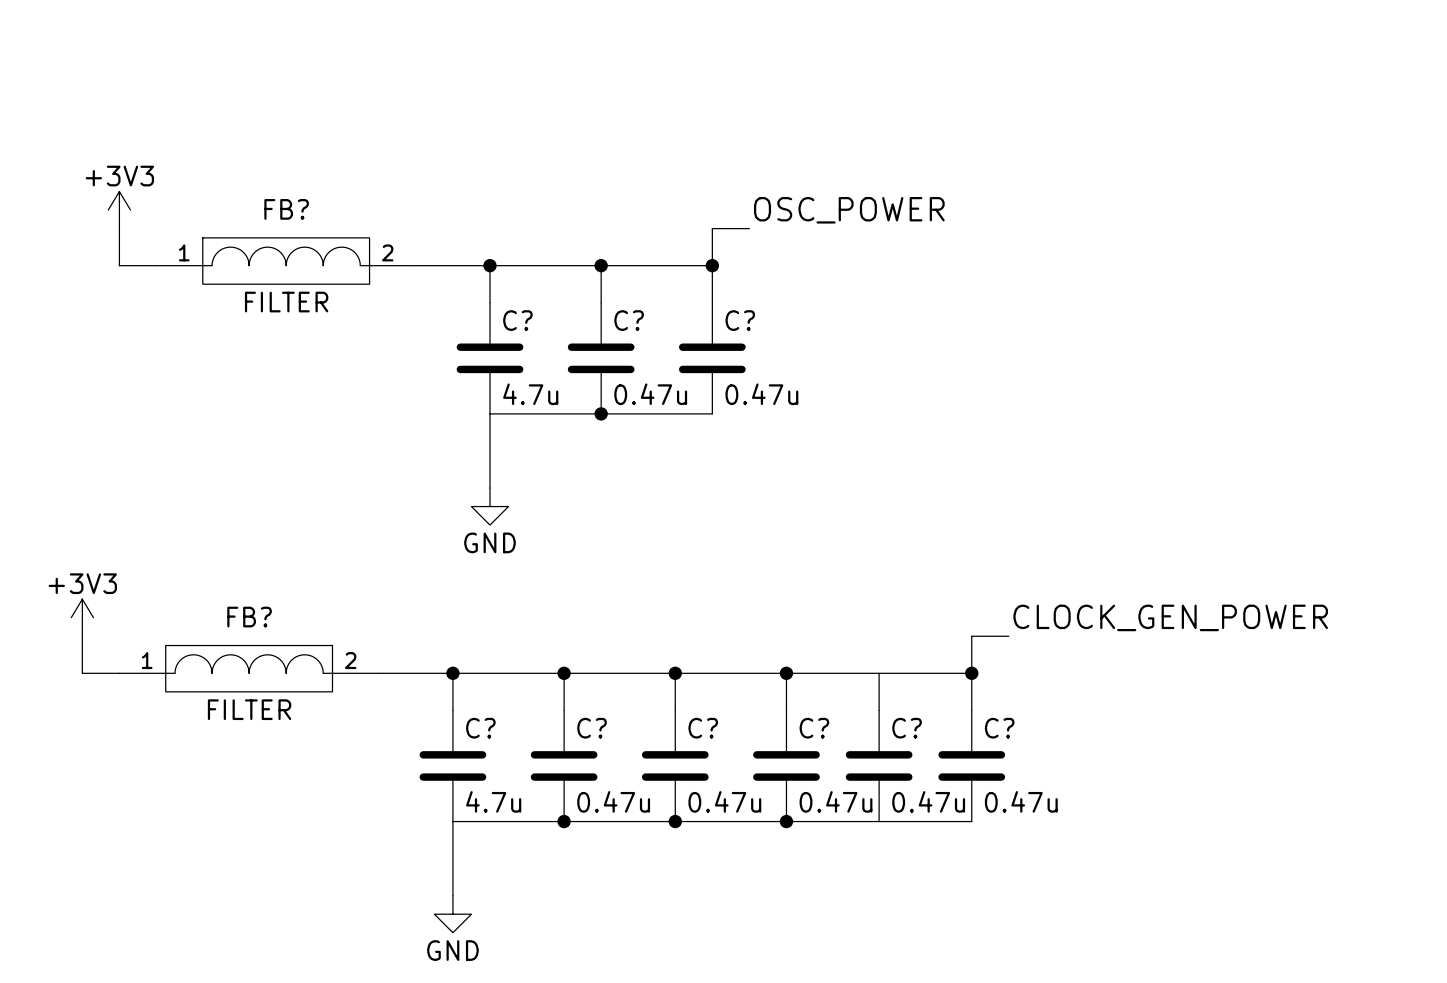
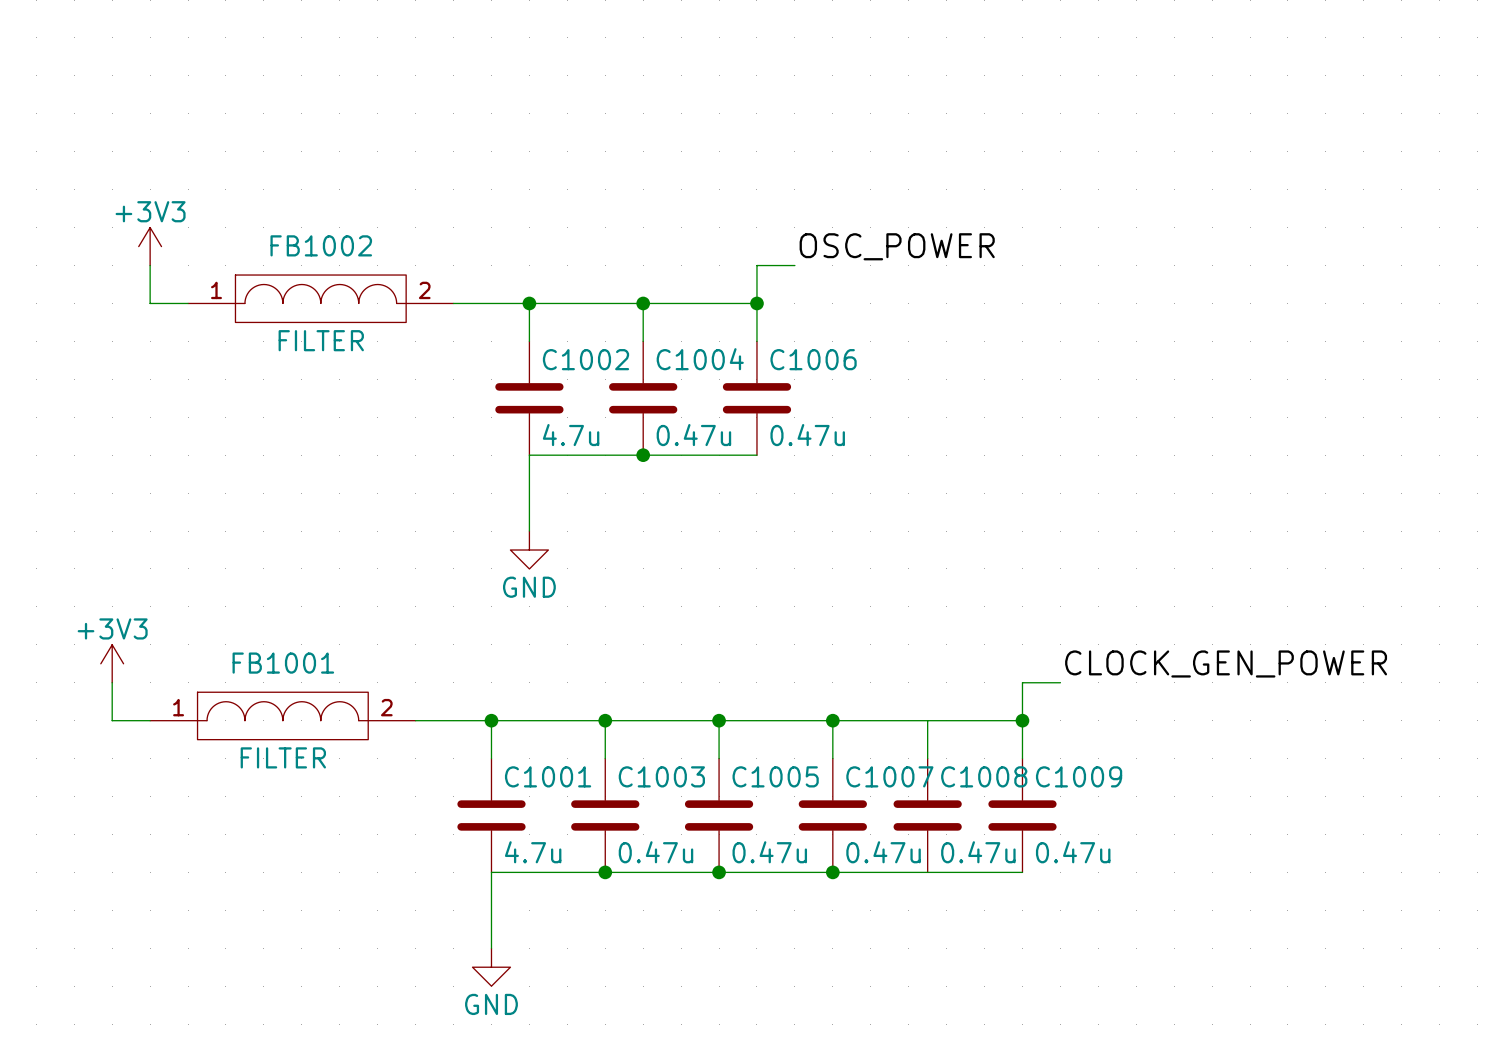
FB? name: FB? (286, 209) -> FB1002 (321, 245)
C? name: C? (517, 320) -> C1002 (585, 359)
C? name: C? (629, 320) -> C1004 (700, 359)
C? name: C? (740, 320) -> C1006 (813, 359)
FB? name: FB? (249, 617) -> FB1001 (283, 663)
C? name: C? (480, 728) -> C1001 (548, 776)
C? name: C? (592, 728) -> C1003 (661, 776)
C? name: C? (703, 728) -> C1005 (775, 776)
C? name: C? (814, 728) -> C1007 (889, 776)
C? name: C? (907, 728) -> C1008 (984, 776)
C? name: C? (999, 728) -> C1009 (1079, 776)

